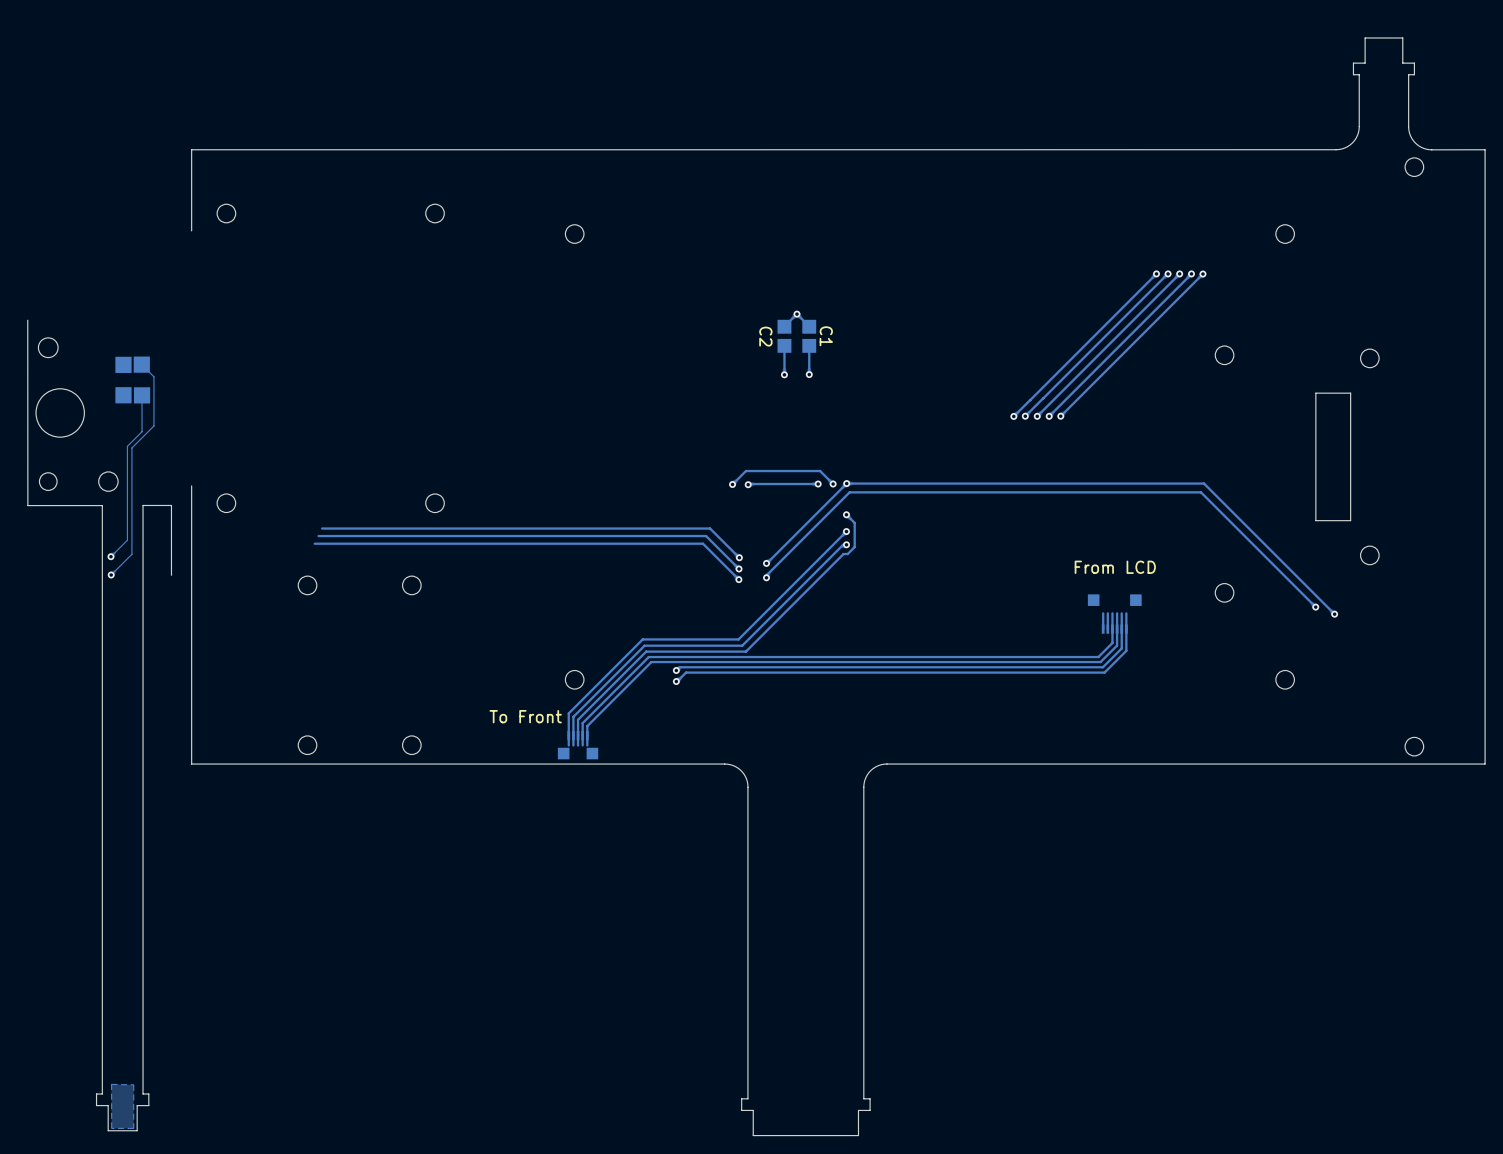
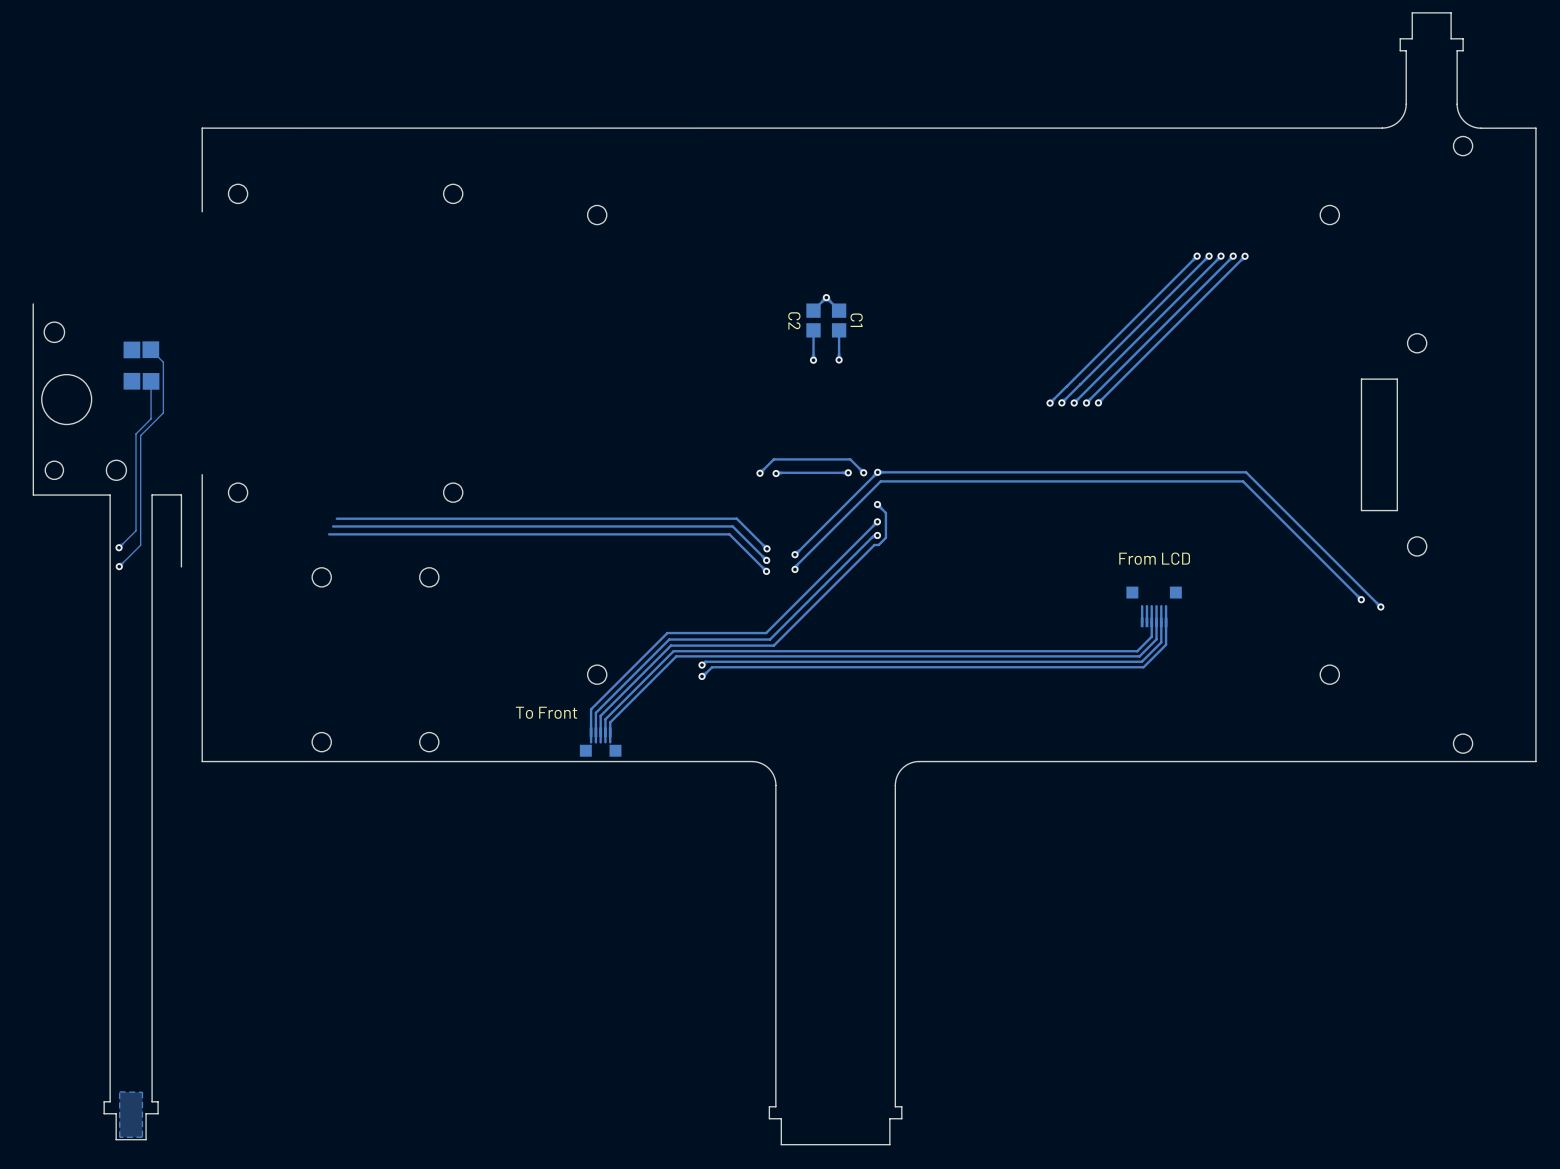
round board edge: [1214, 345, 1235, 365] -> none
round board edge: [1214, 583, 1235, 603] -> none

